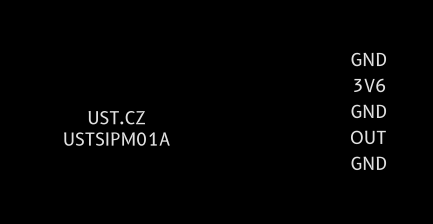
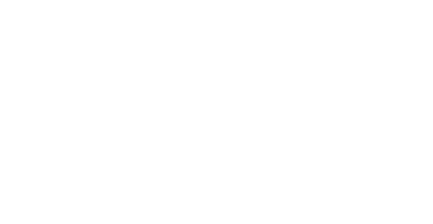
text: GND (368, 59) -> none
text: 3V6 (369, 85) -> none
text: GND (368, 111) -> none
text: UST.CZ (116, 117) -> none
text: OUT (368, 137) -> none
text: USTSIPM01A (116, 139) -> none
text: GND (368, 163) -> none

